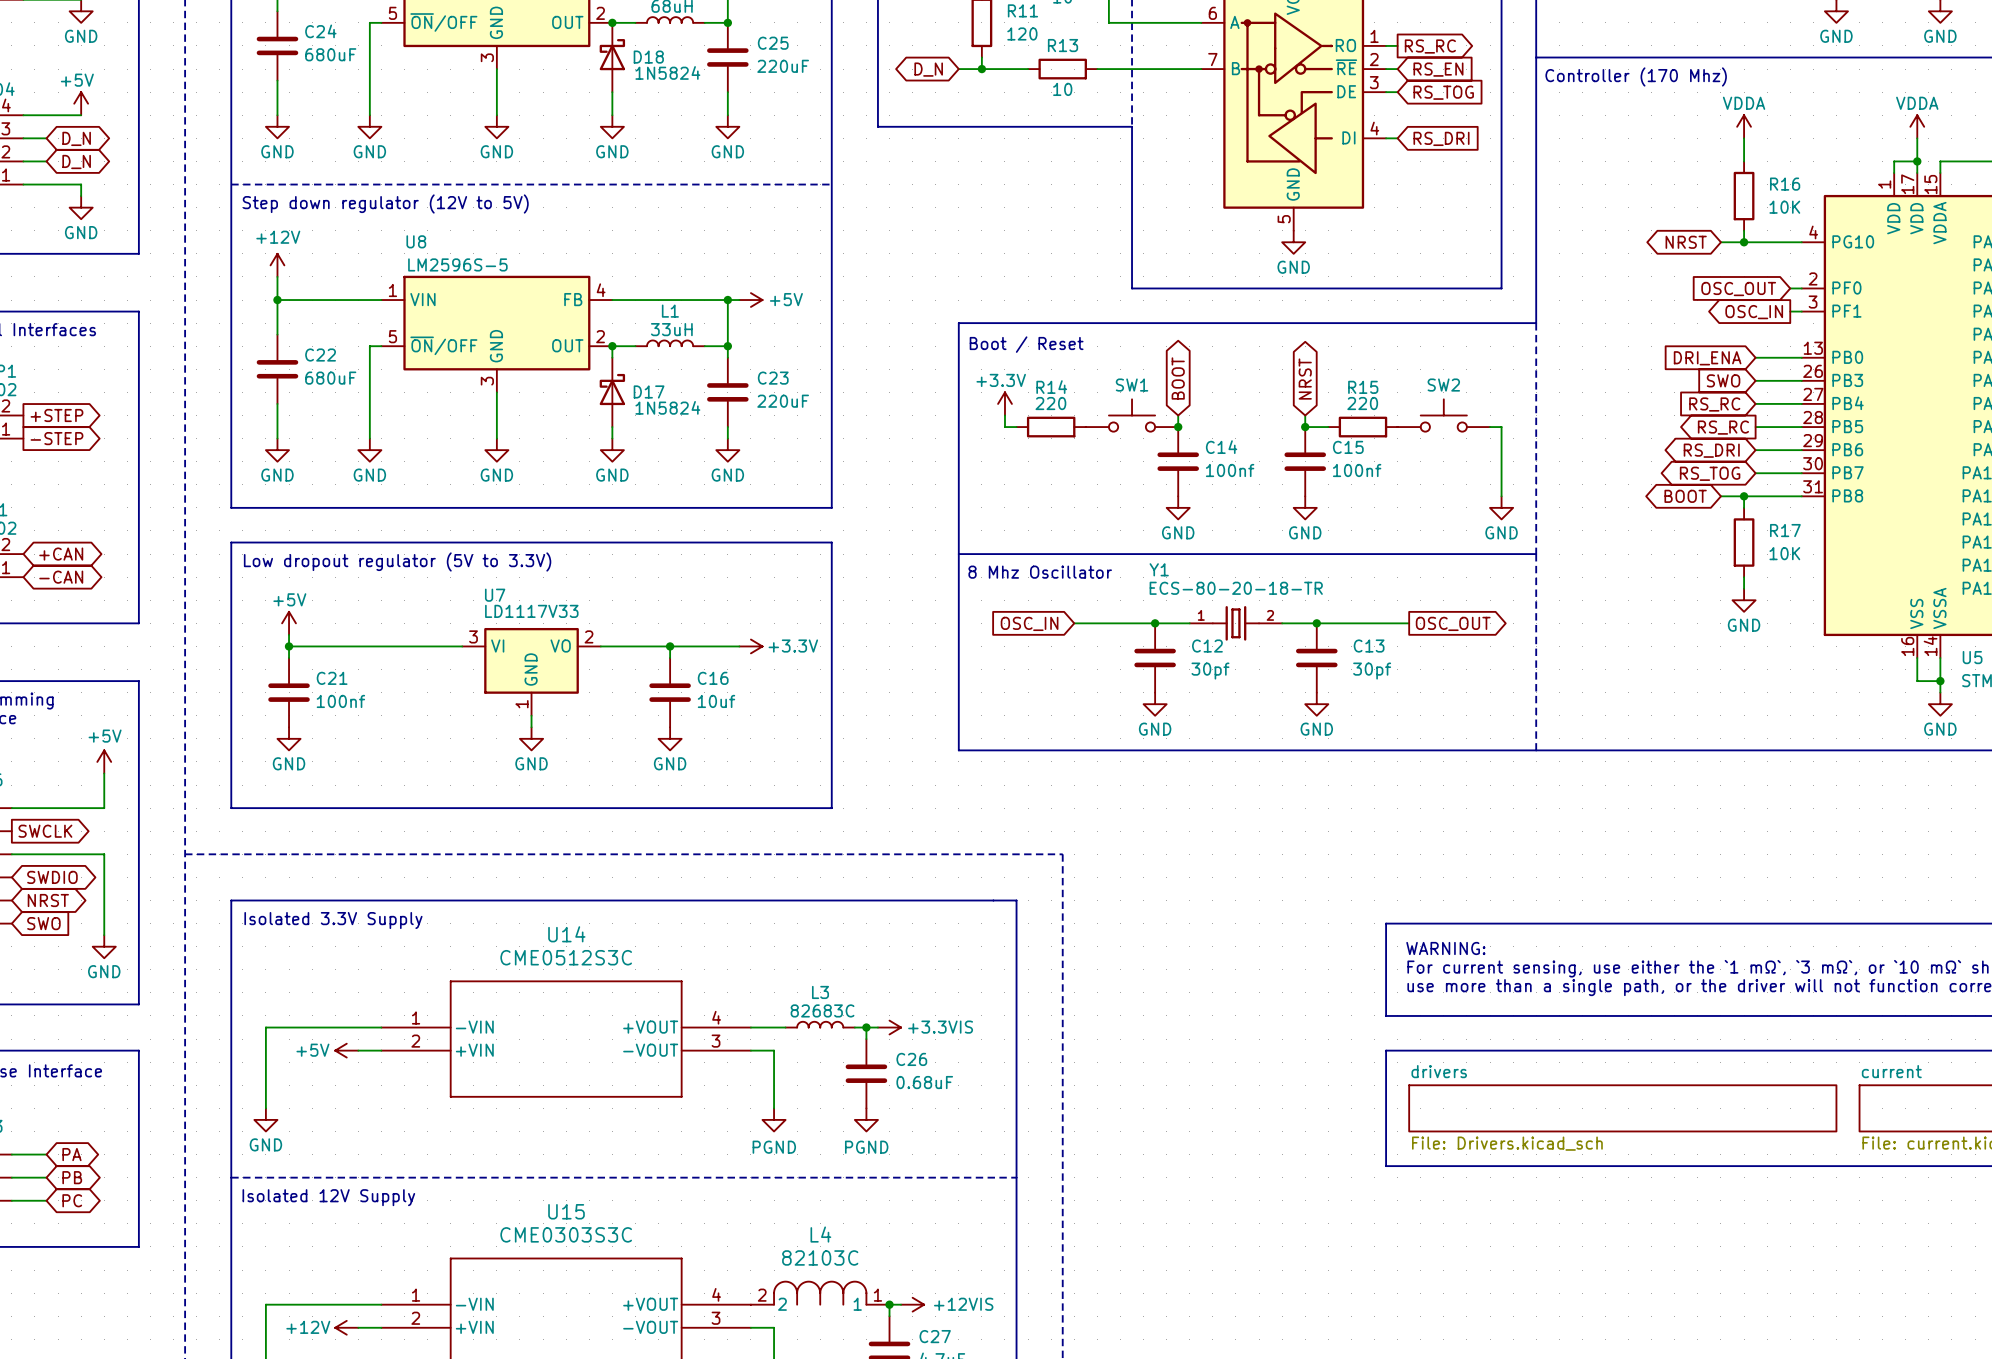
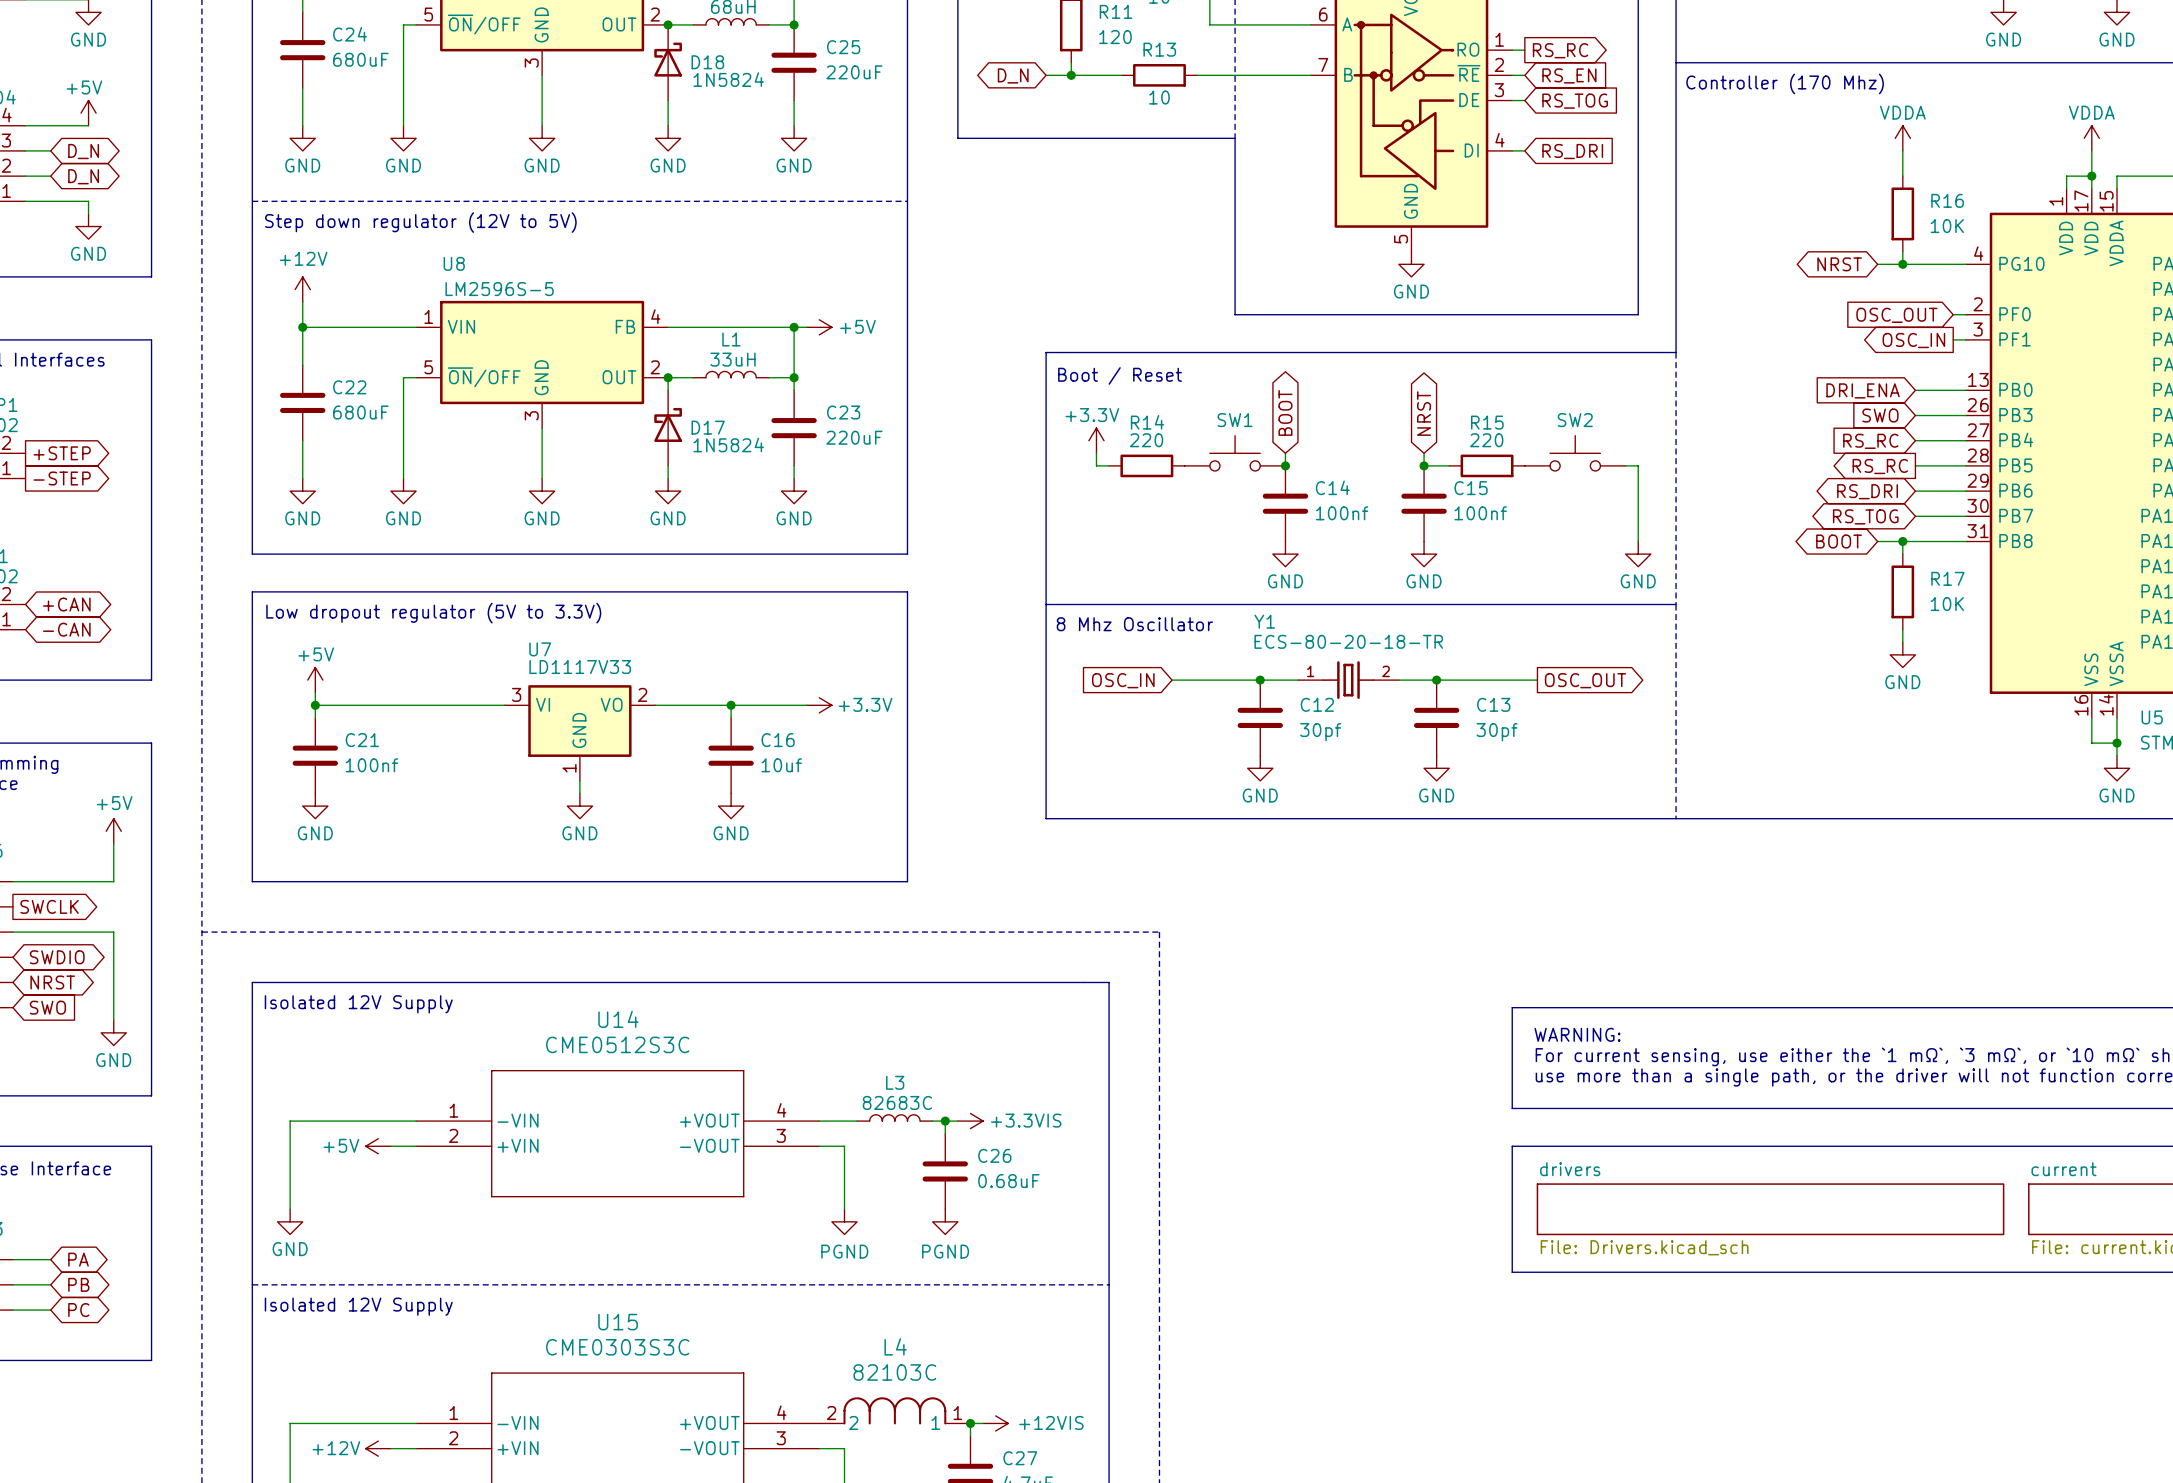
text: Isolated 3.3V Supply (333, 920) -> Isolated 12V Supply (358, 1004)

